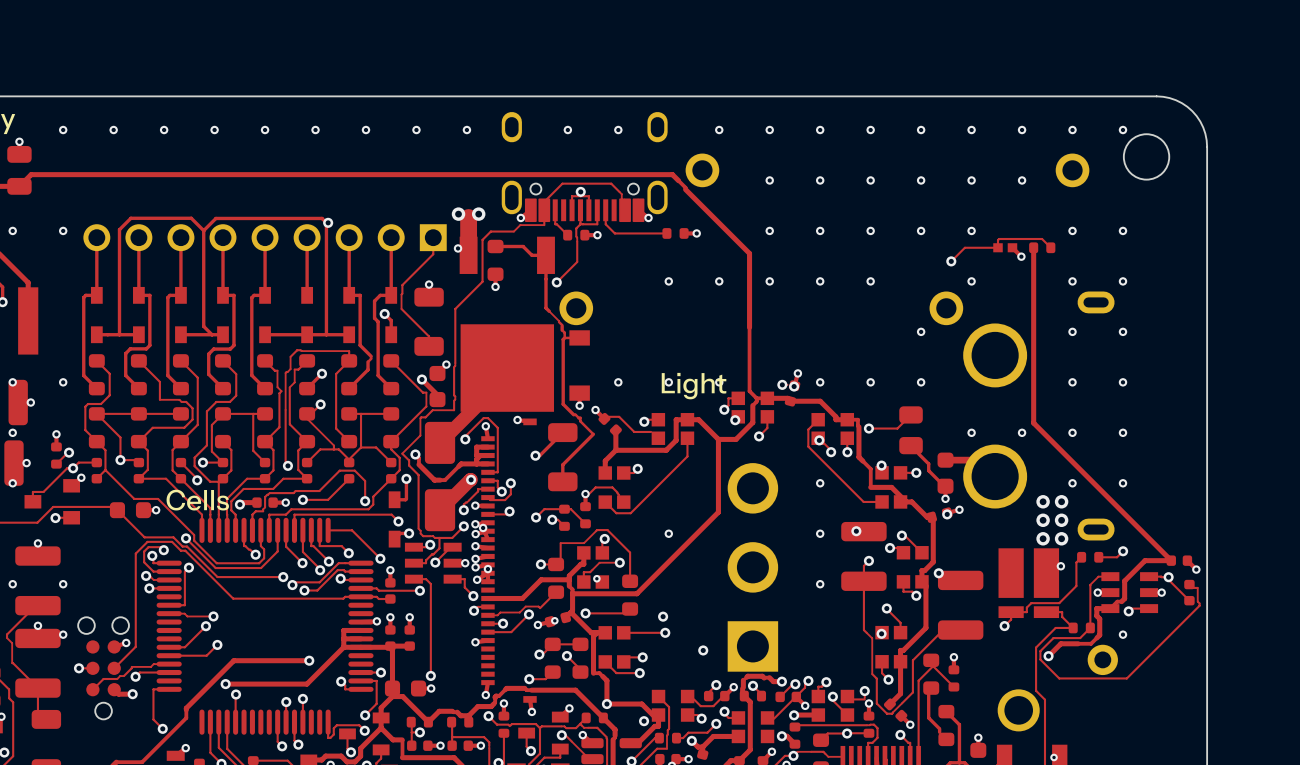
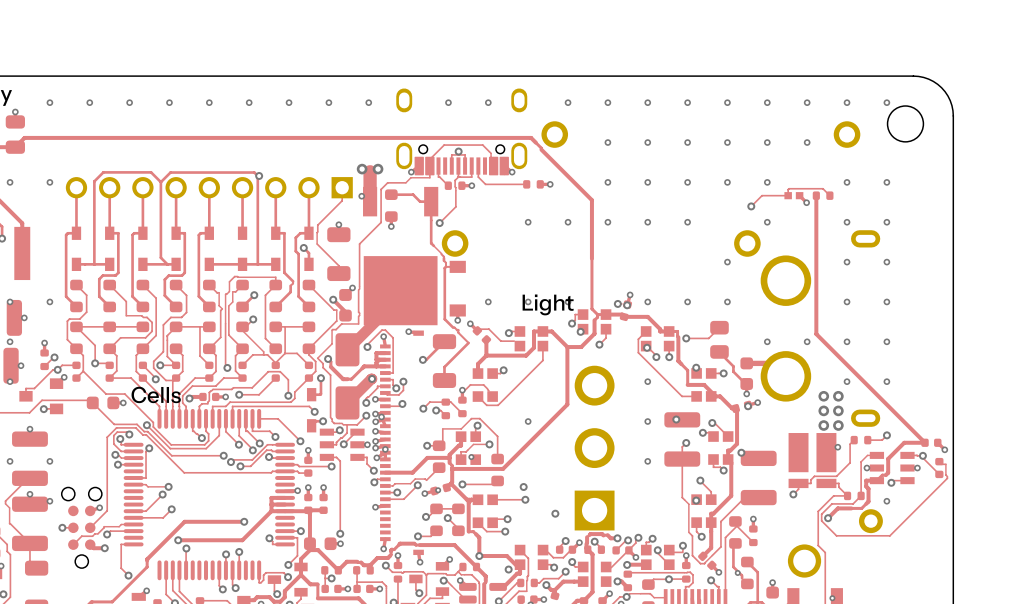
via: none -> (737, 572)

